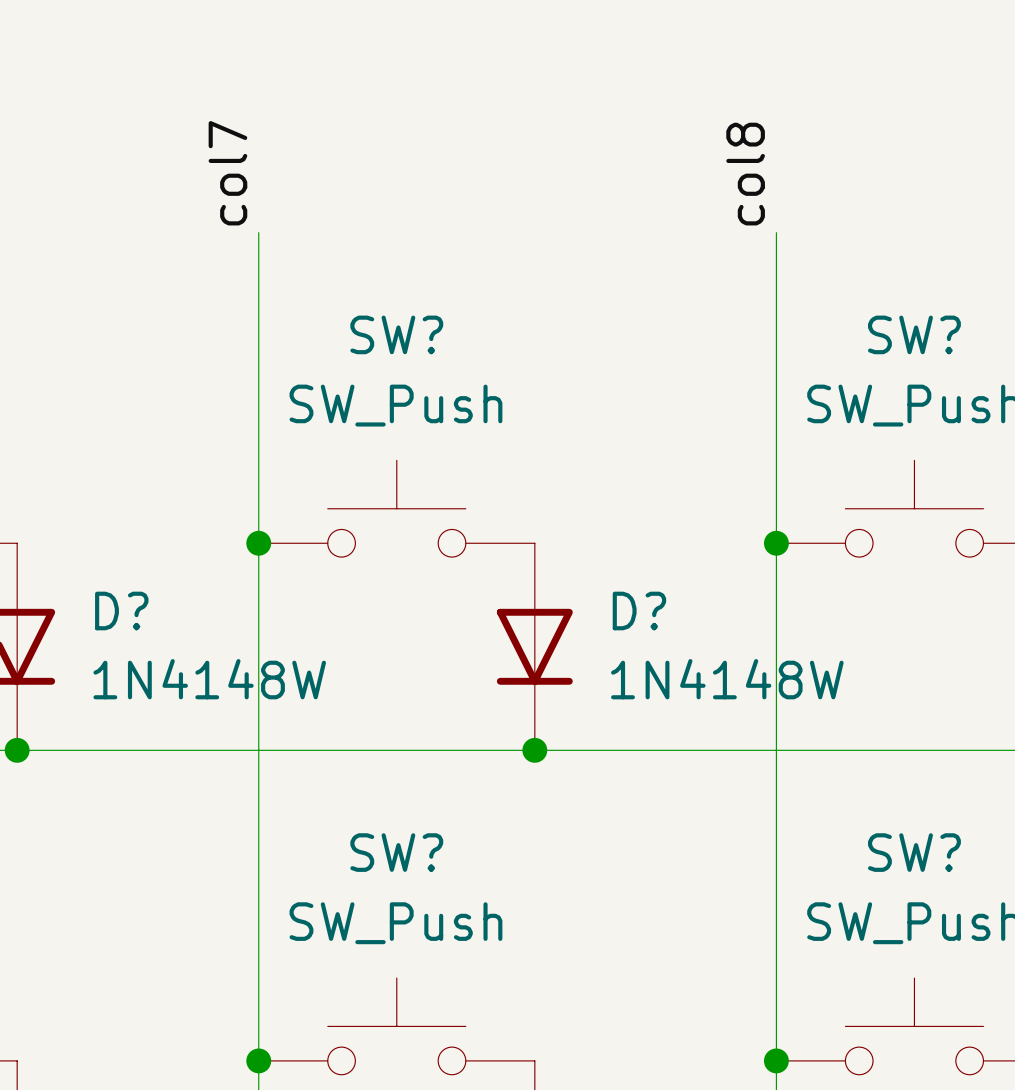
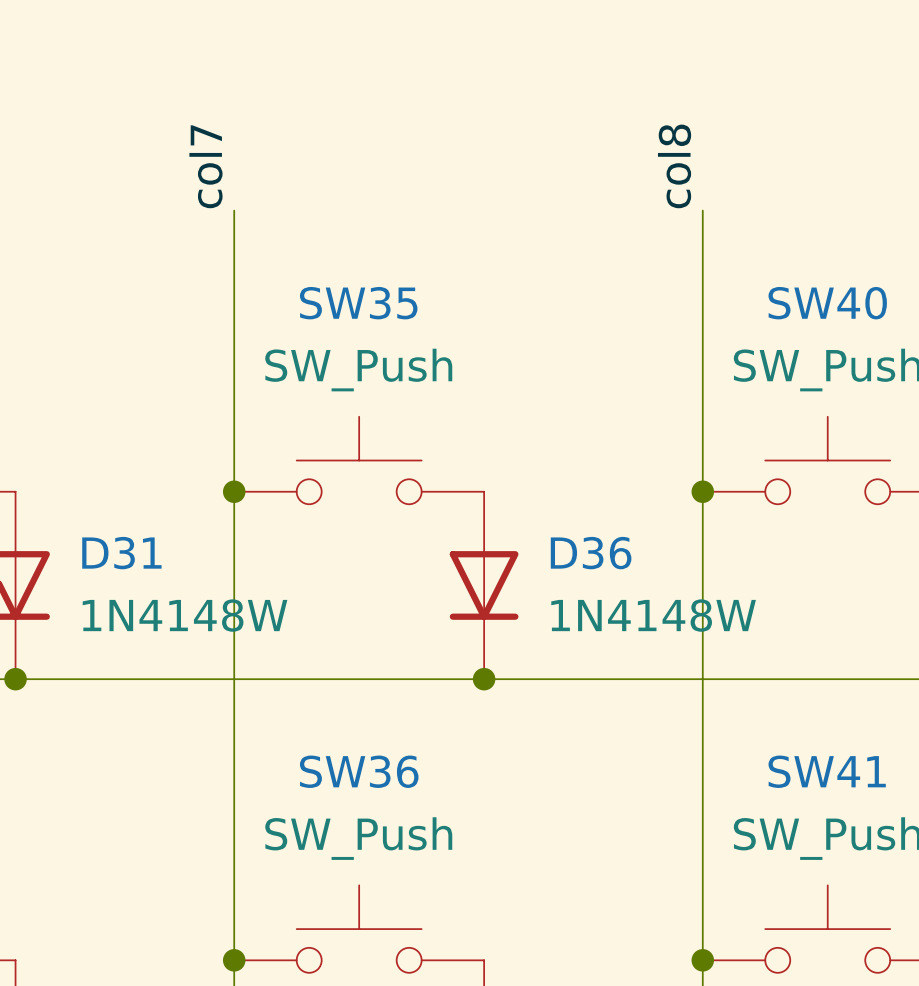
SW? name: SW? (396, 334) -> SW35 (358, 303)
SW? name: SW? (914, 334) -> SW40 (827, 303)
D? name: D? (121, 610) -> D31 (121, 553)
D? name: D? (639, 610) -> D36 (591, 553)
SW? name: SW? (396, 852) -> SW36 (359, 771)
SW? name: SW? (914, 852) -> SW41 (827, 771)

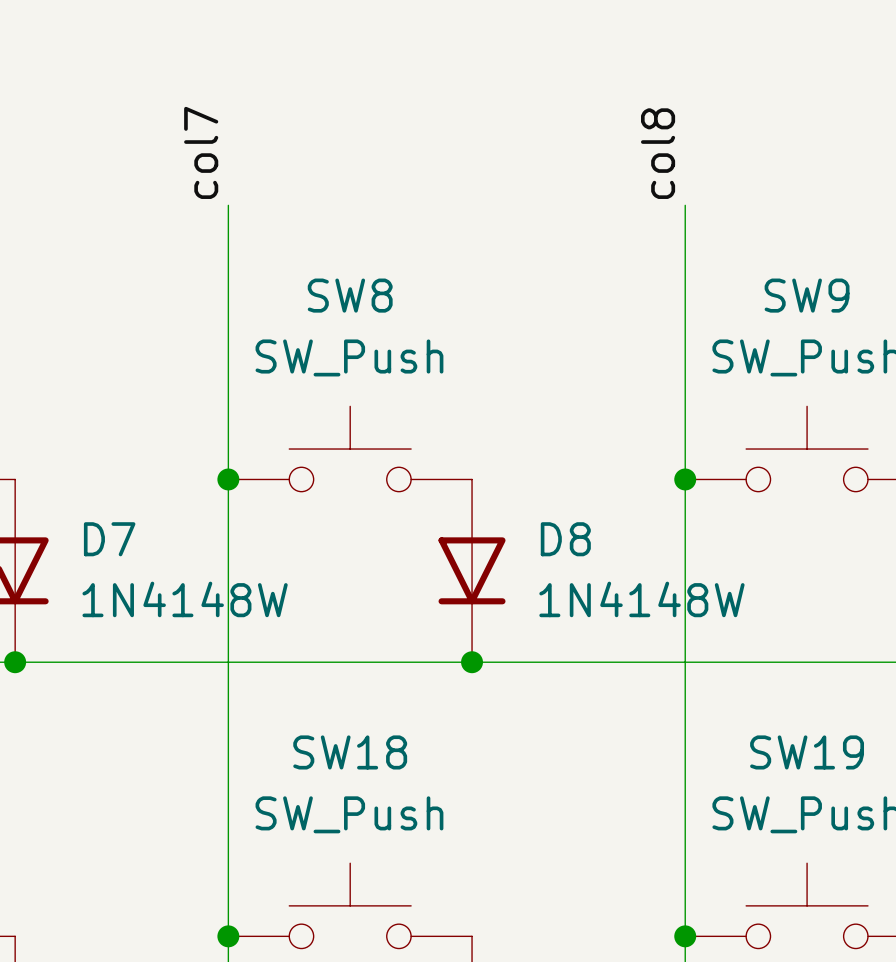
SW35 name: SW35 (358, 303) -> SW8 (350, 295)
SW40 name: SW40 (827, 303) -> SW9 (807, 295)
D31 name: D31 (121, 553) -> D7 (109, 539)
D36 name: D36 (591, 553) -> D8 (565, 539)
SW36 name: SW36 (359, 771) -> SW18 (350, 752)
SW41 name: SW41 (827, 771) -> SW19 (807, 752)

